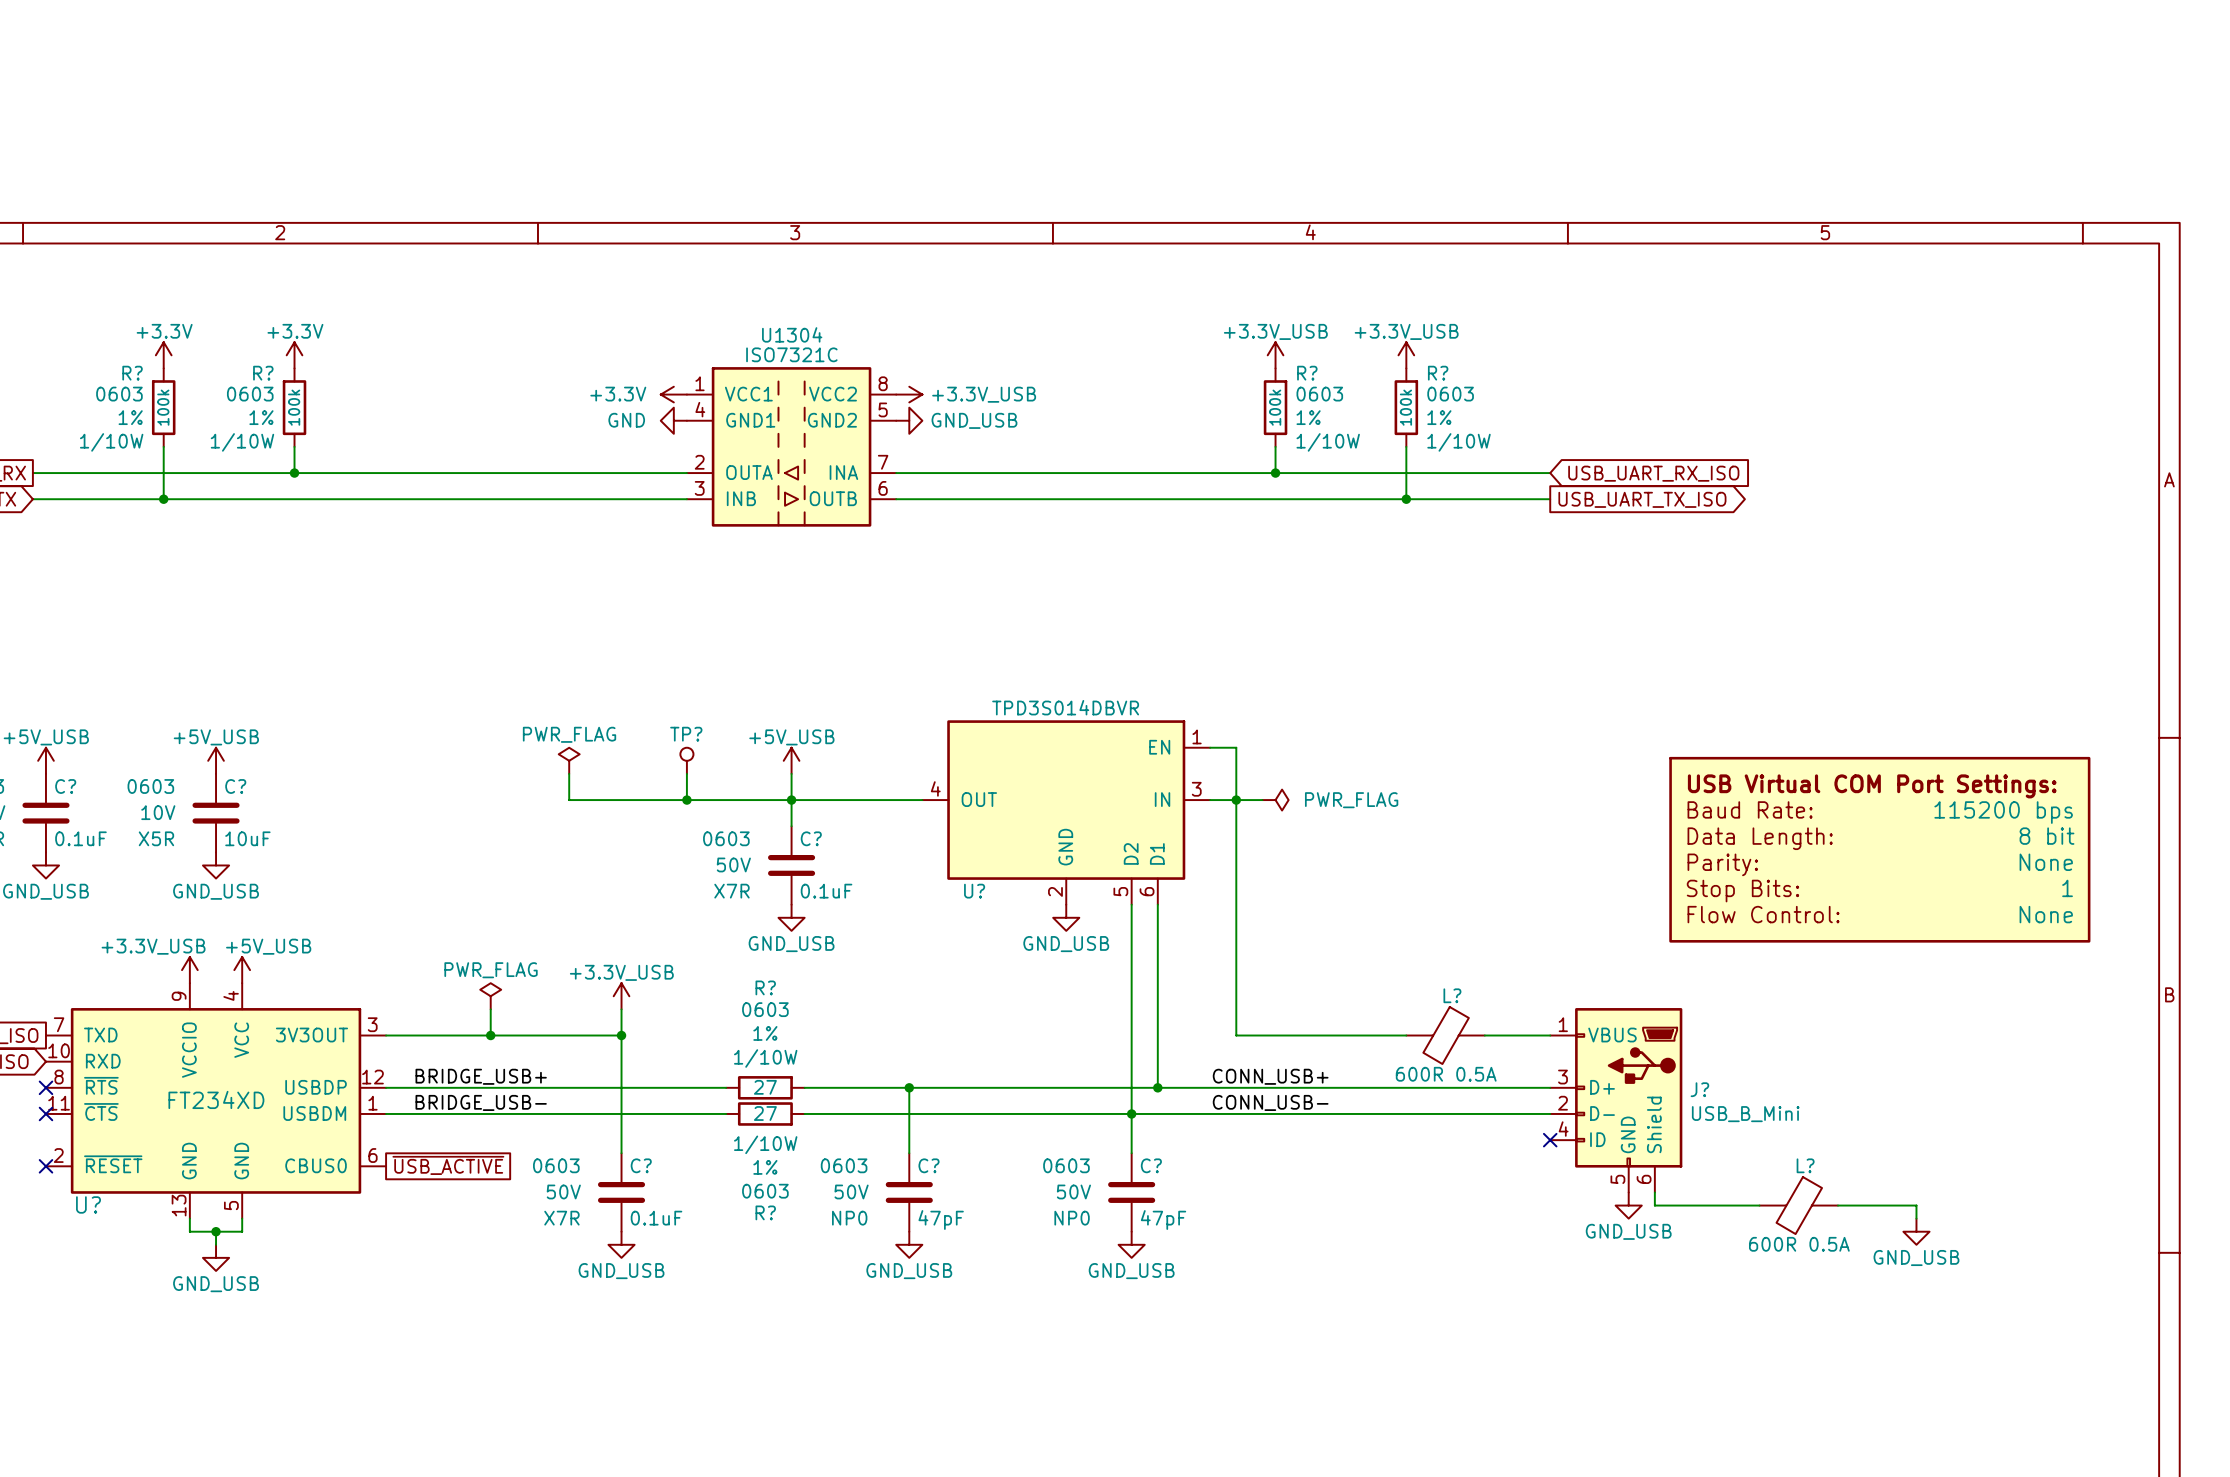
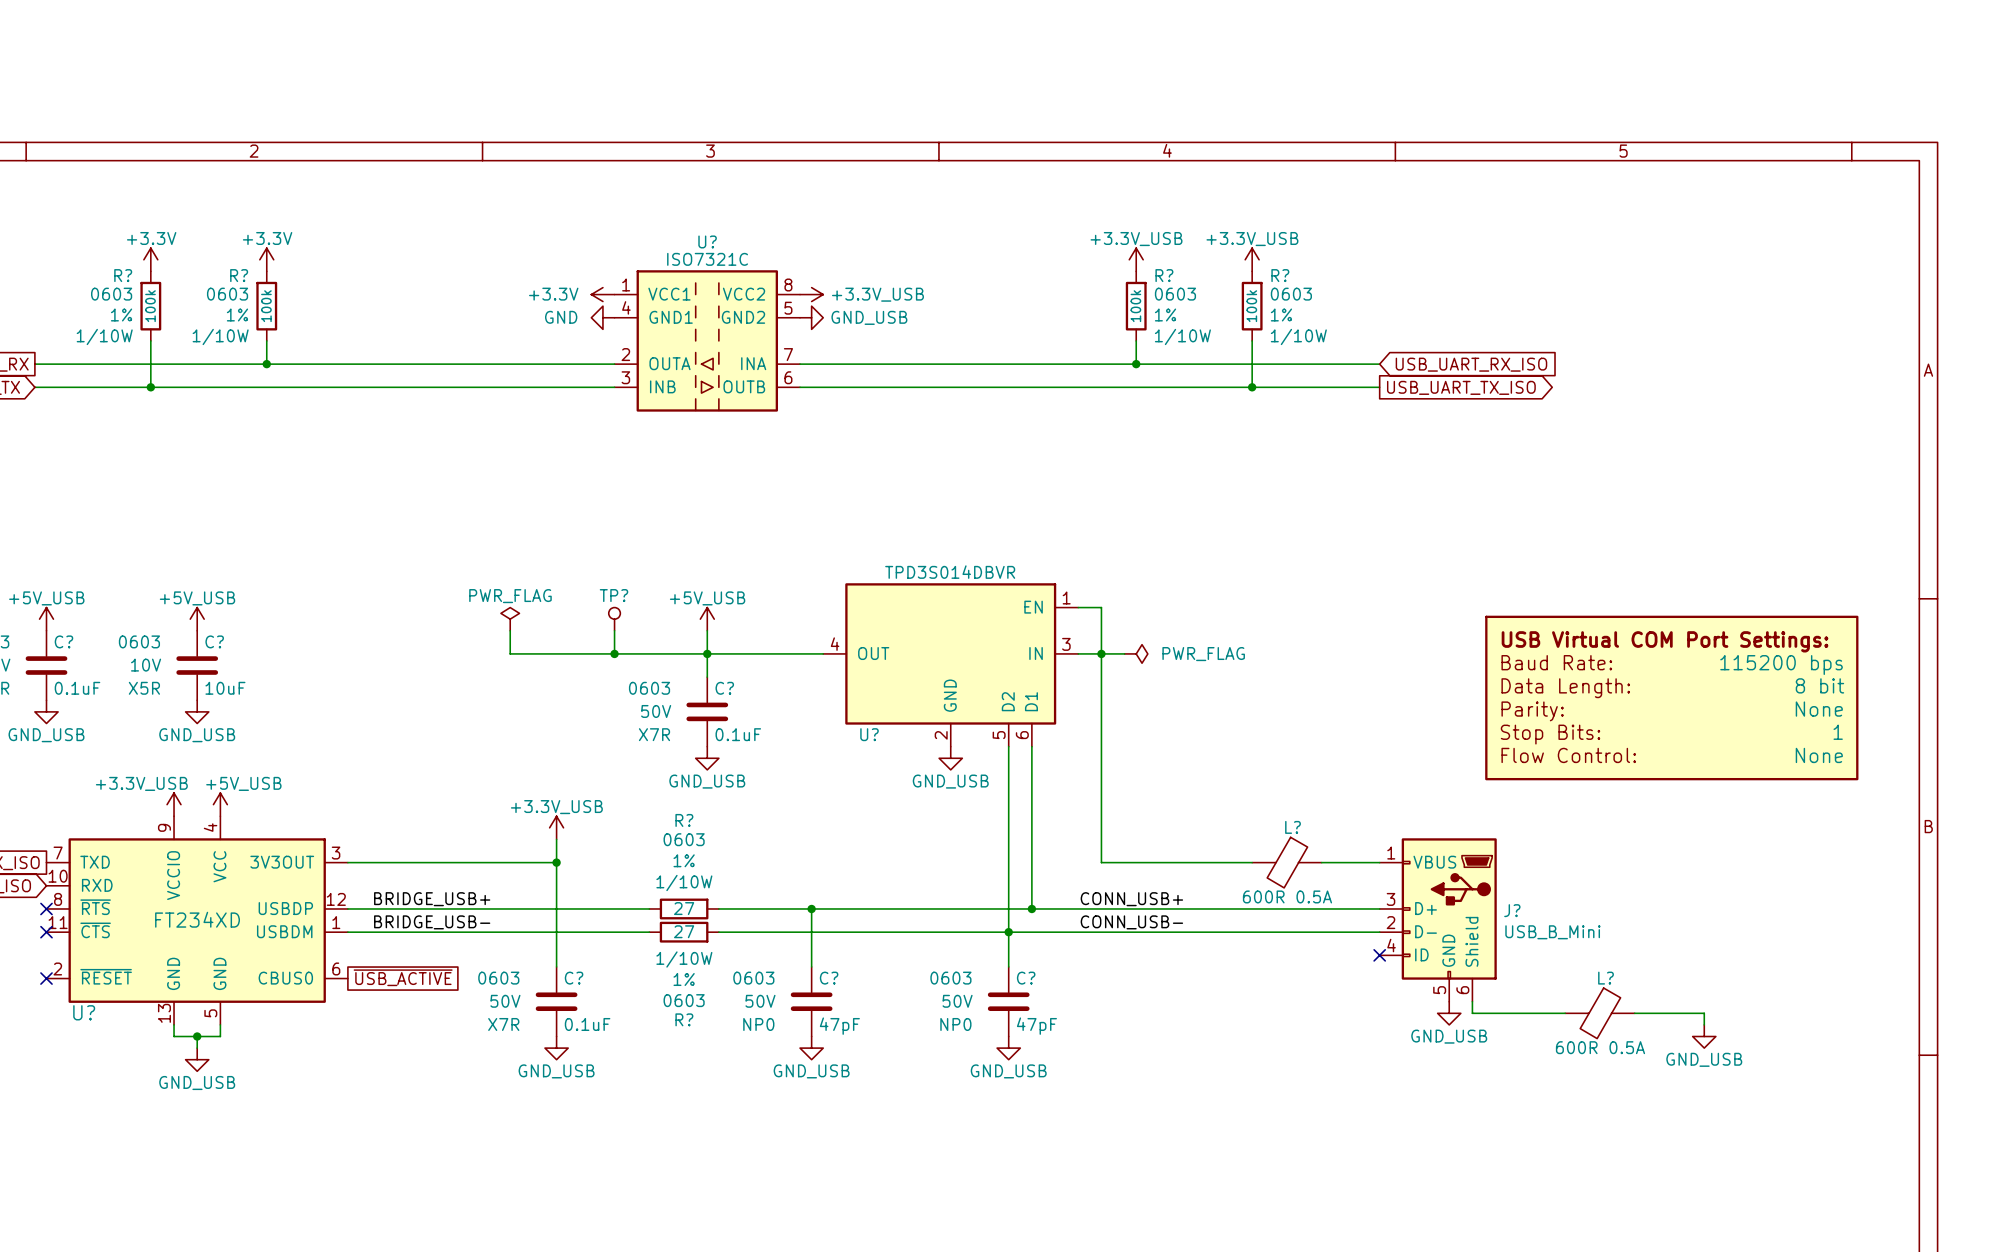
U1304 name: U1304 (792, 334) -> U? (707, 241)
power symbol: PWR_FLAG (490, 996) -> none
wire: (490, 1009) (490, 1035) -> none
junction: (490, 1035) -> none

